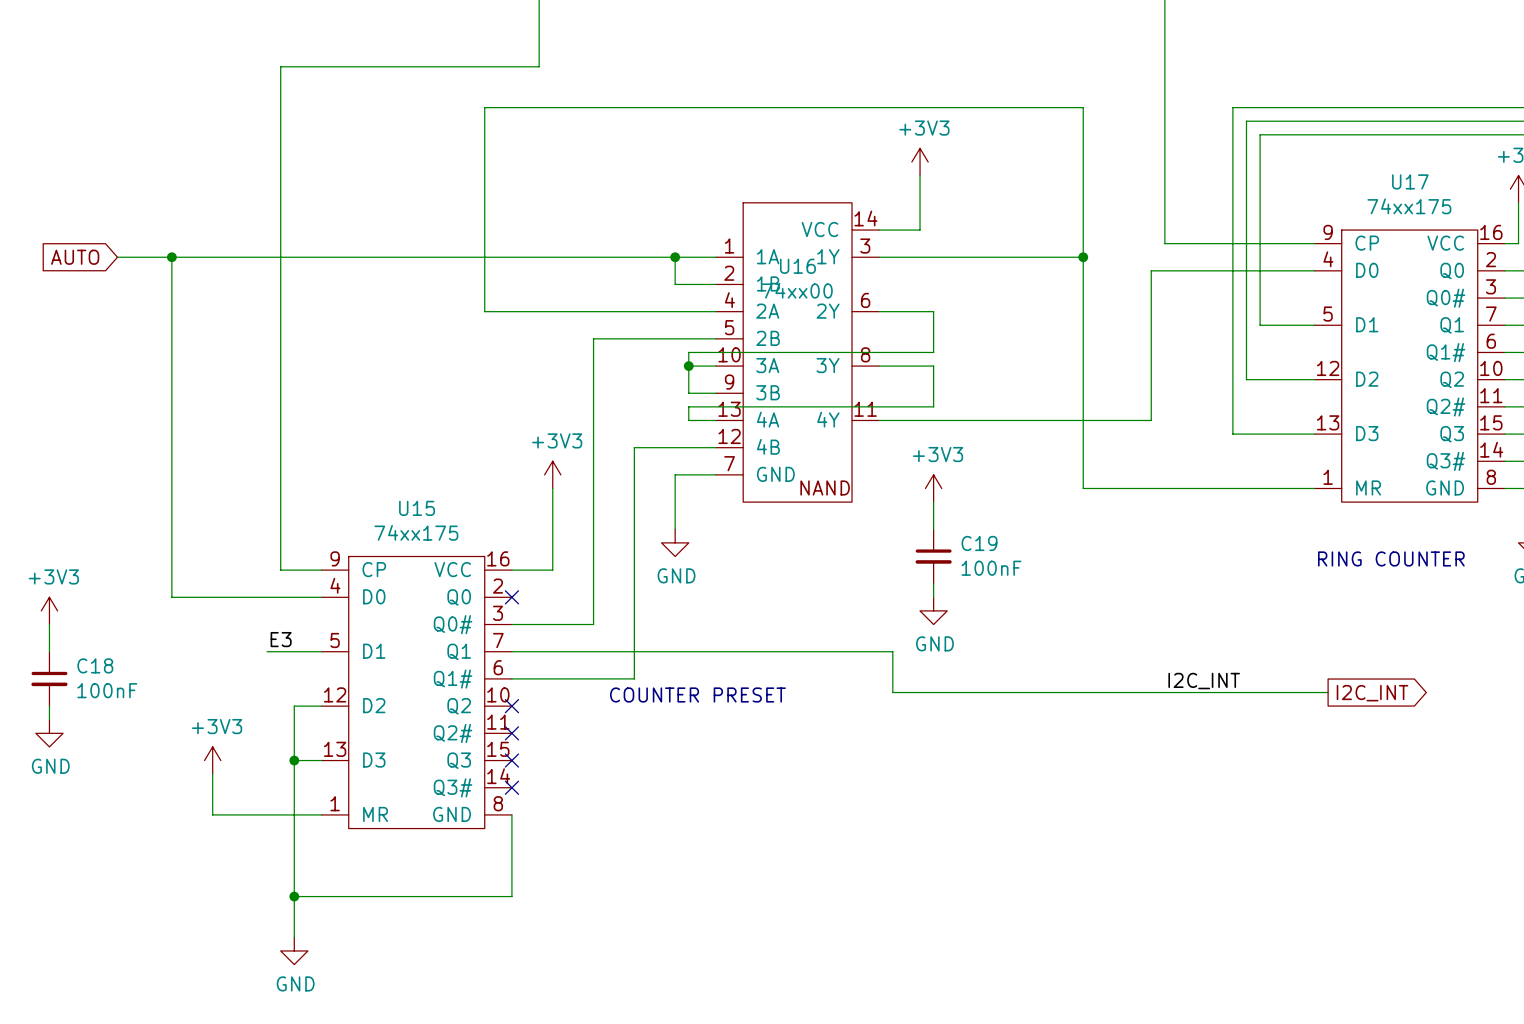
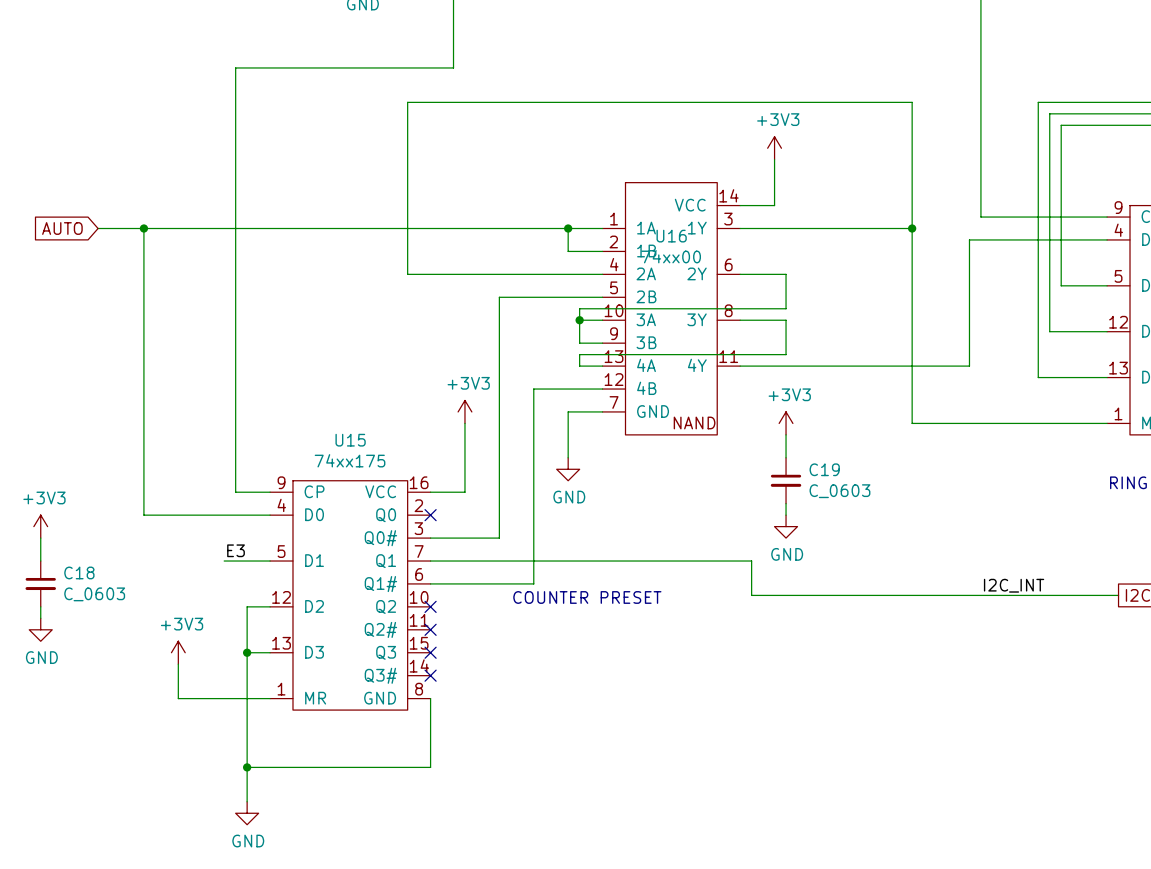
C19 value: 100nF (991, 568) -> C_0603 (839, 491)
C18 value: 100nF (107, 690) -> C_0603 (94, 594)

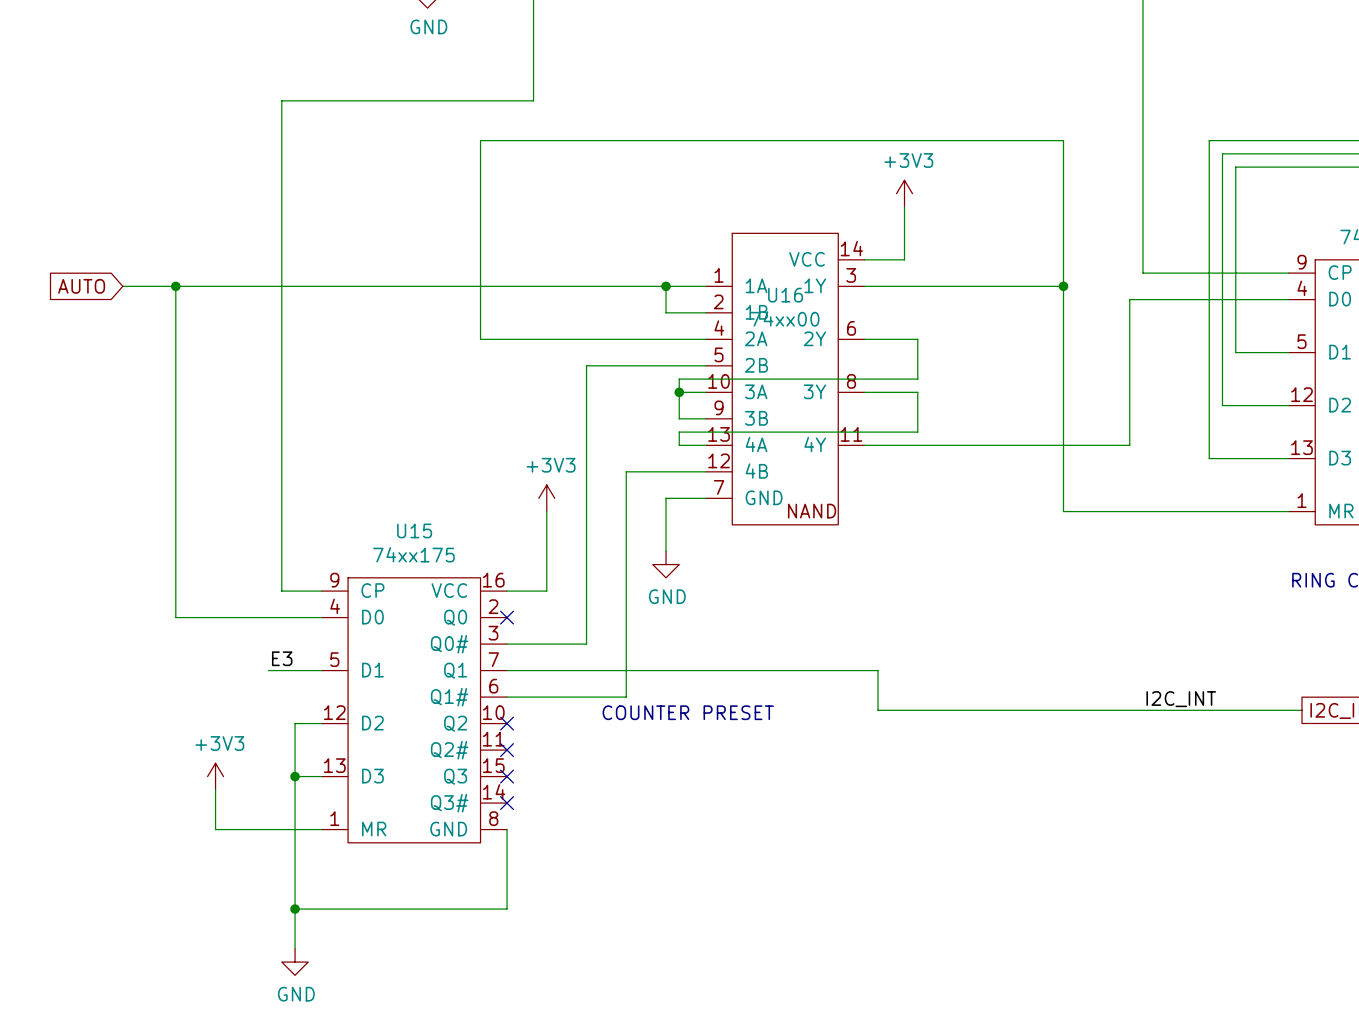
power symbol: +3V3 (786, 423) -> none
wire: (786, 434) (786, 457) -> none
C19: C_0603 (786, 480) -> none
wire: (786, 503) (786, 515) -> none
power symbol: +3V3 (40, 526) -> none
power symbol: GND (786, 526) -> none
wire: (40, 538) (40, 561) -> none
C18: C_0603 (40, 583) -> none
wire: (40, 606) (40, 618) -> none
power symbol: GND (40, 629) -> none

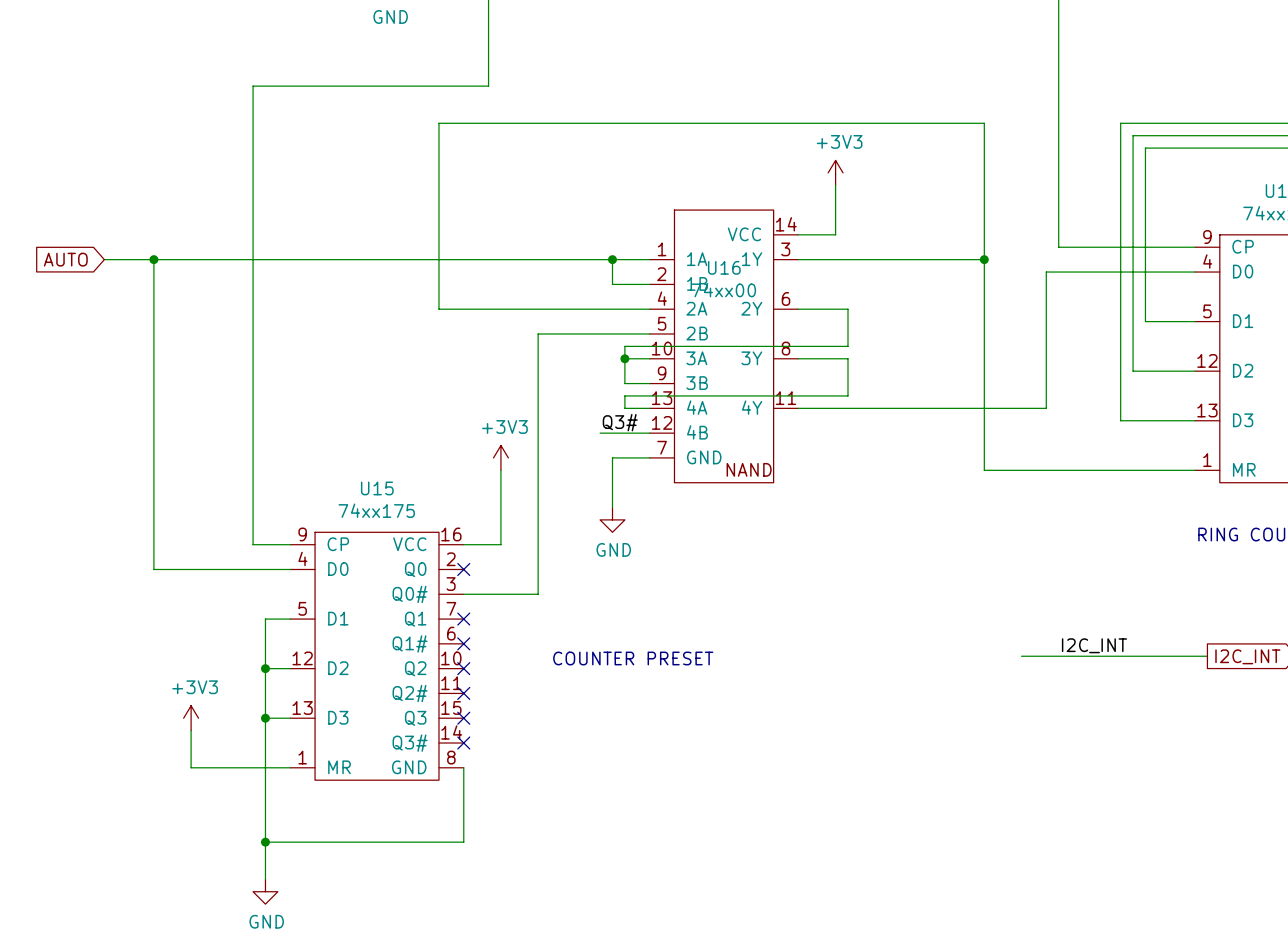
label: none -> Q3# (620, 422)
wire: (652, 471) (626, 471) (626, 697) (507, 697) -> none
label: E3 (282, 658) -> none
wire: (268, 670) (295, 670) -> (265, 668) (265, 619)
wire: (507, 670) (878, 670) (878, 710) (1103, 710) -> none
no-connect mark: none -> (463, 619)
no-connect mark: none -> (463, 643)
junction: none -> (265, 668)

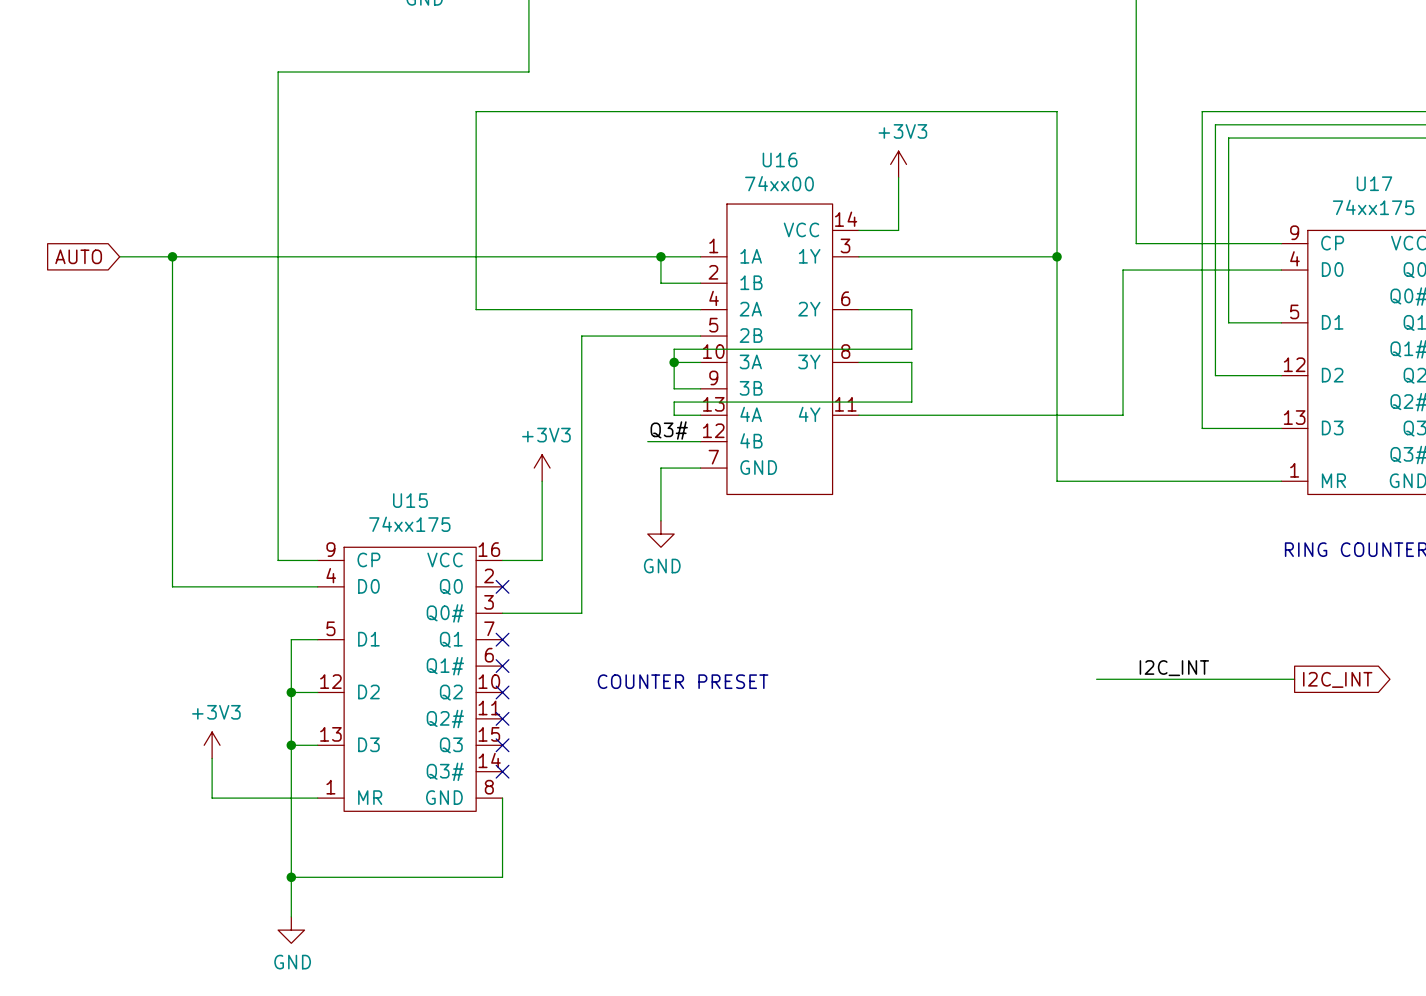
U16 name position: U16 (724, 267) -> U16 (780, 159)
U16 value position: 74xx00 (723, 290) -> 74xx00 (779, 183)
U16 text: NAND (749, 469) -> none

